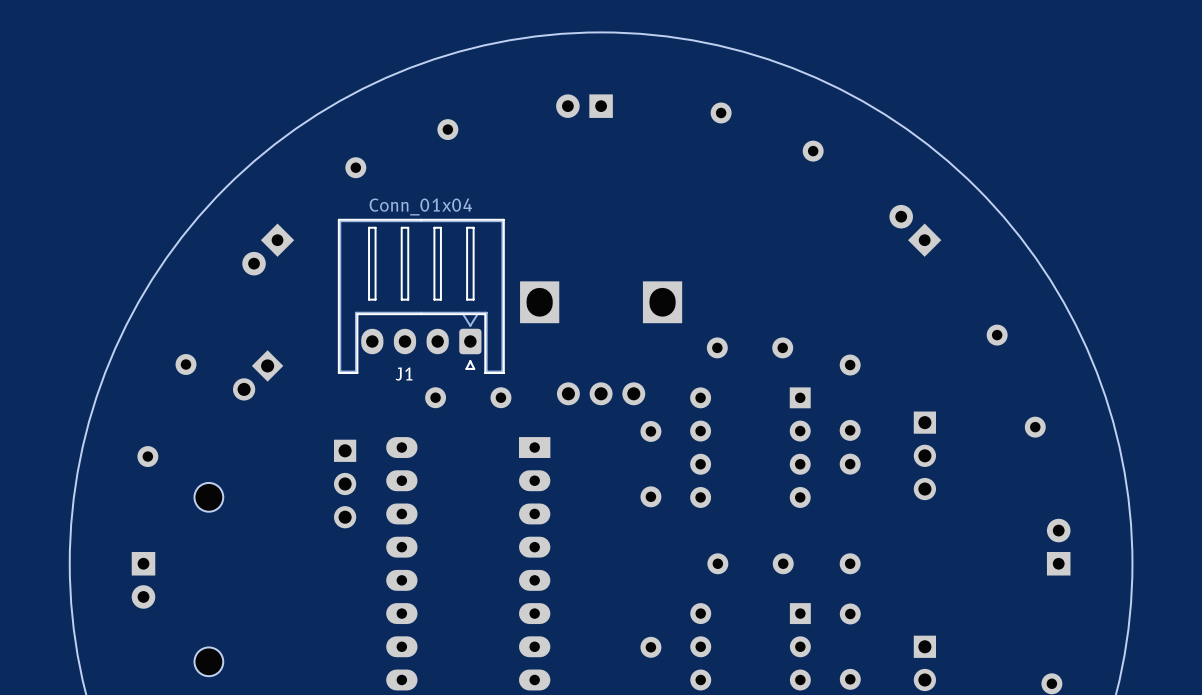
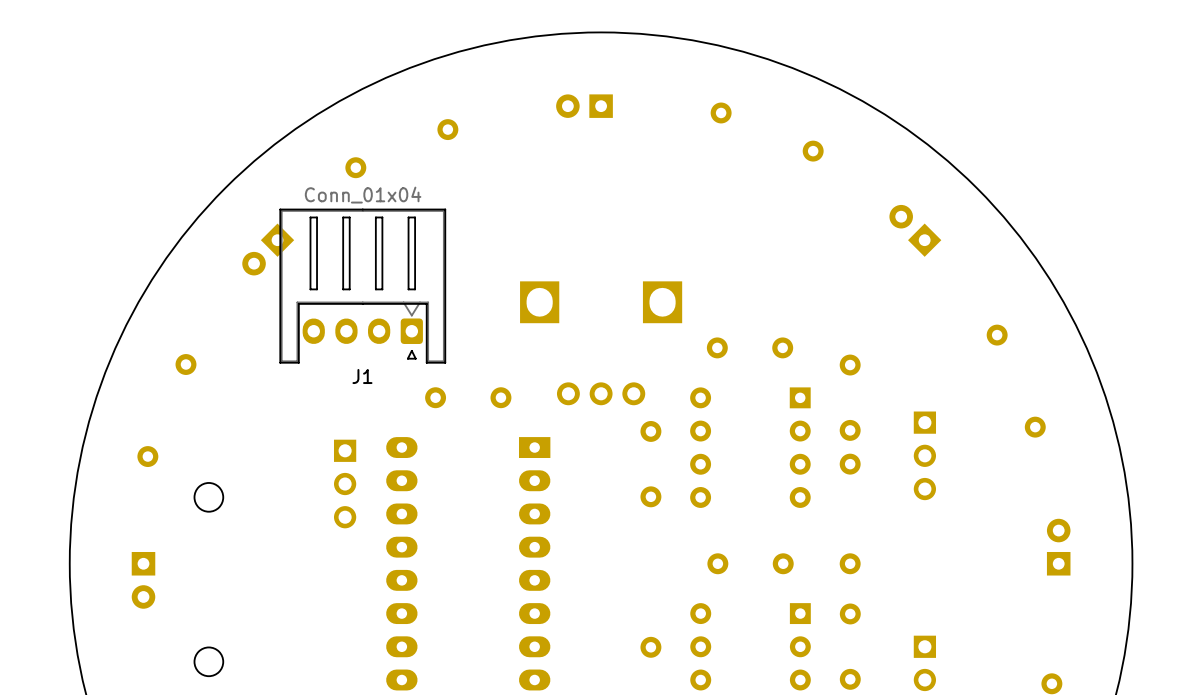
J1 position: (421, 296) -> (362, 286)
J1 name position: J1 (404, 374) -> J1 (362, 376)
part: (258, 375) -> none

